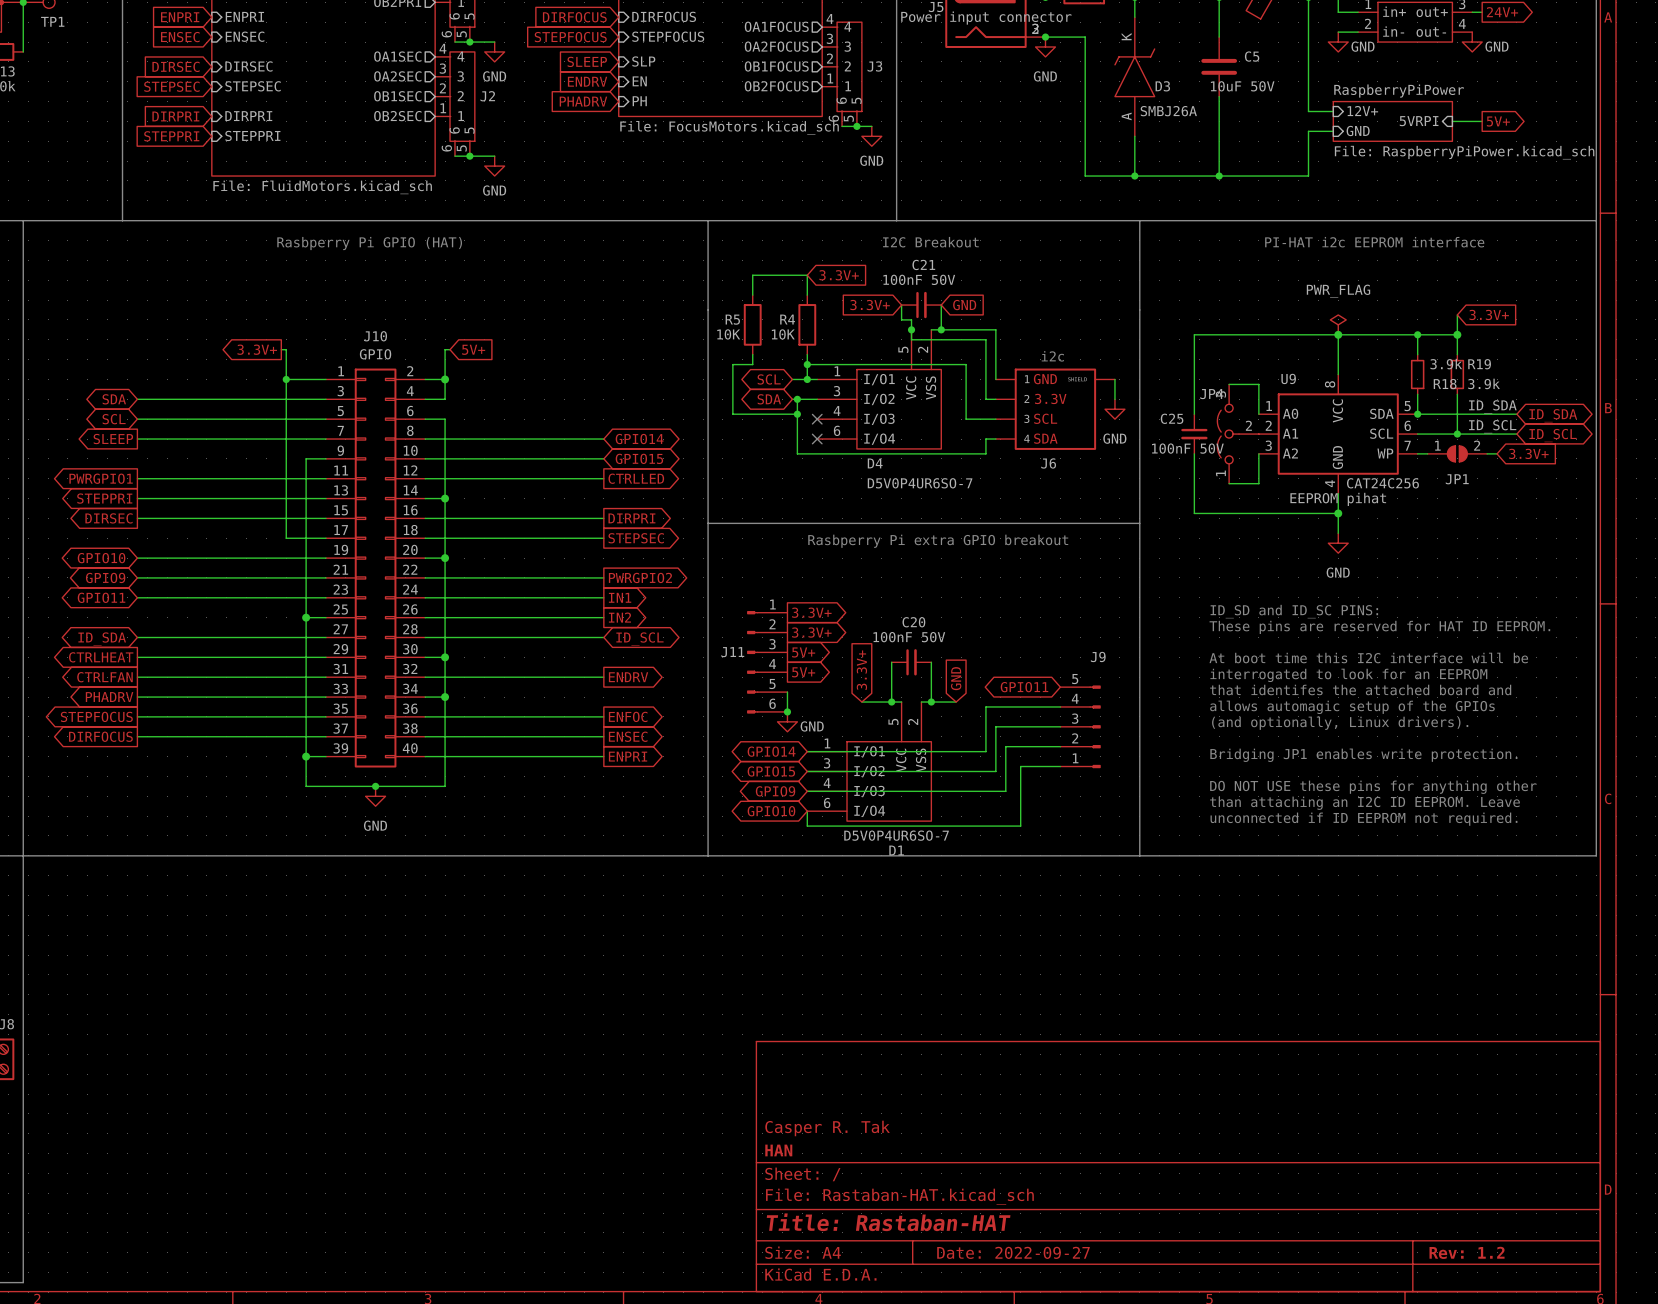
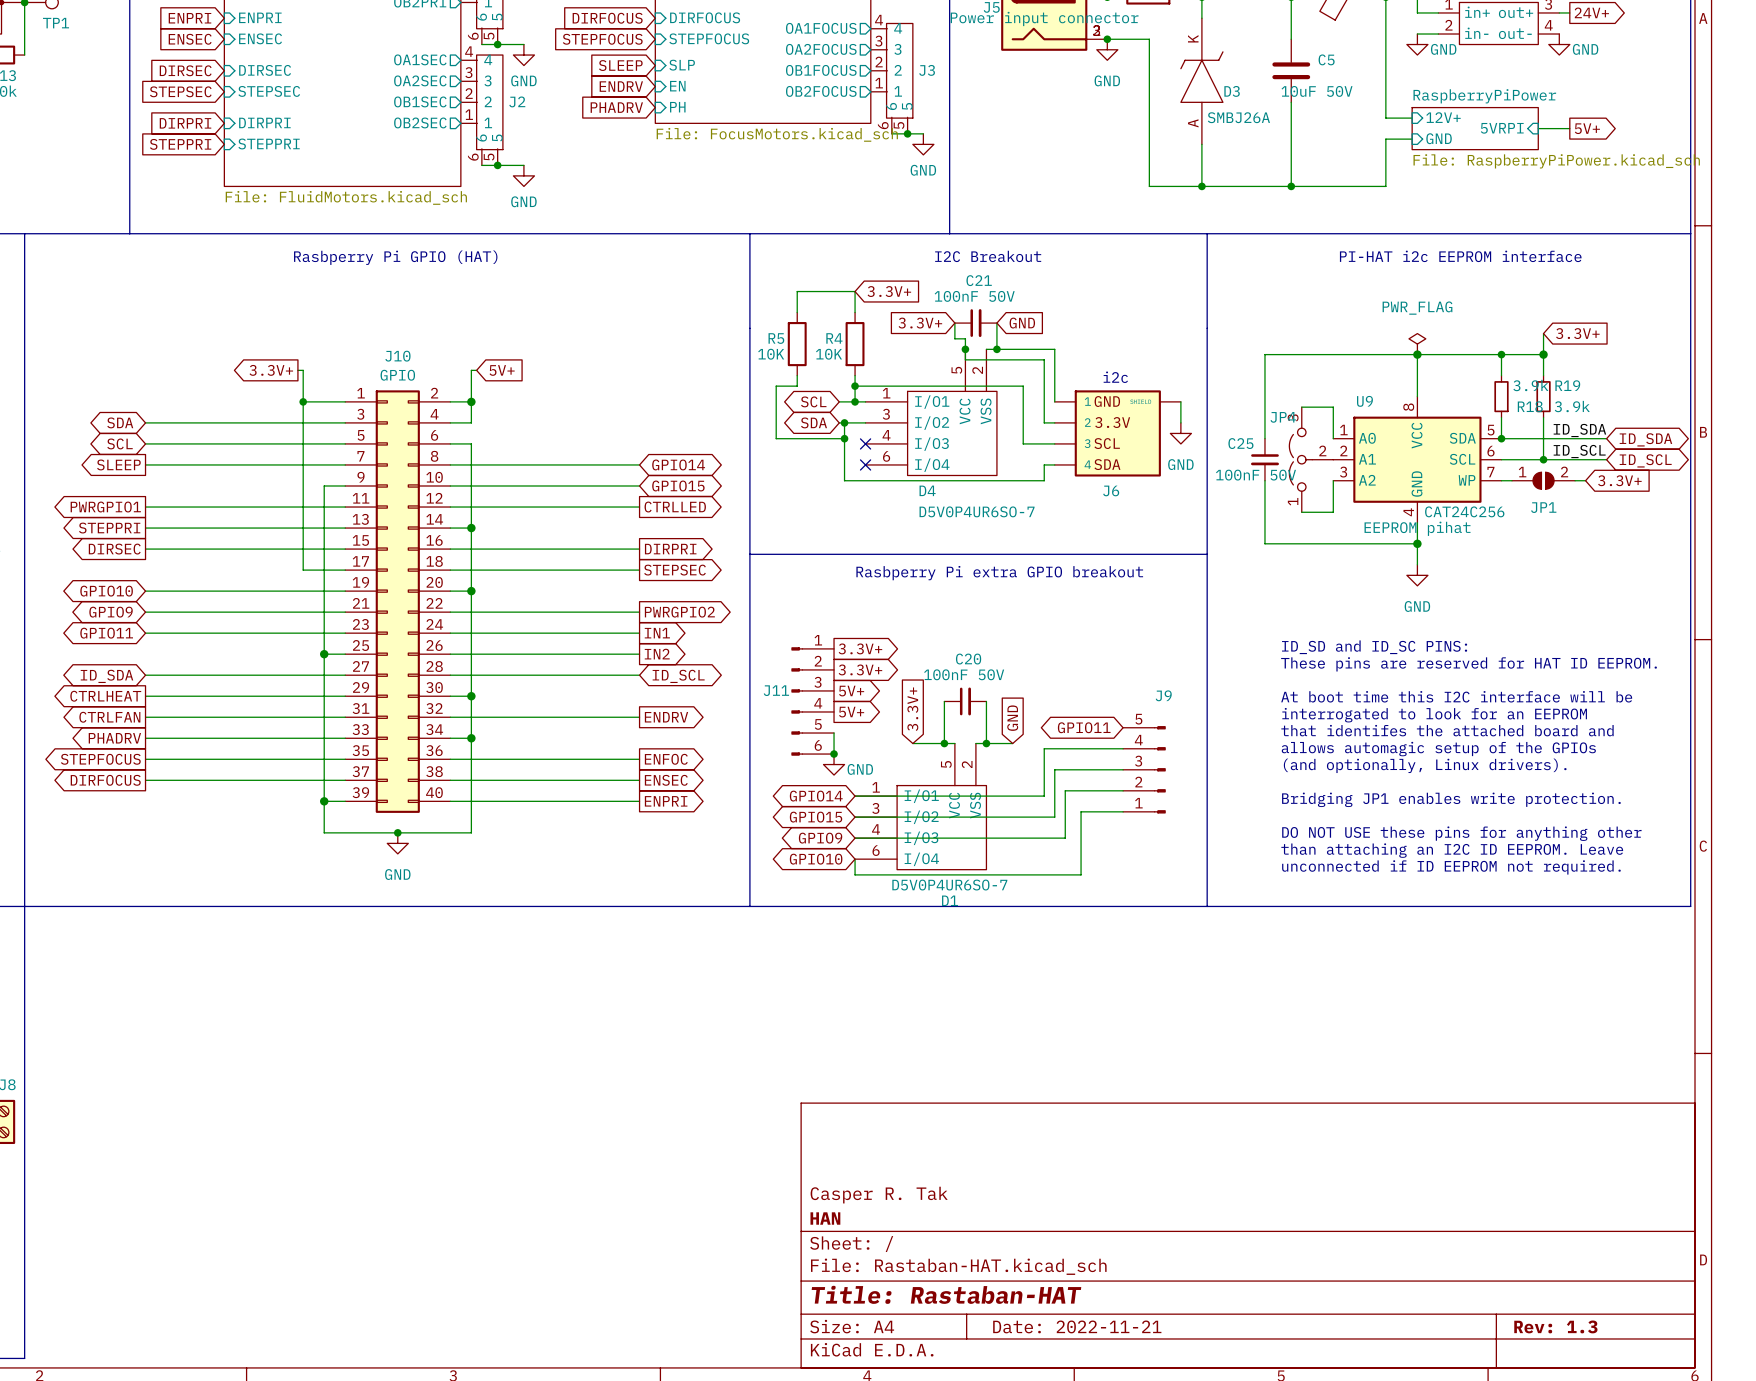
title block: Date: 2022-09-27 (1013, 1252) -> Date: 2022-11-21 (1077, 1326)
title block: Rev: 1.2 (1467, 1252) -> Rev: 1.3 (1555, 1326)

